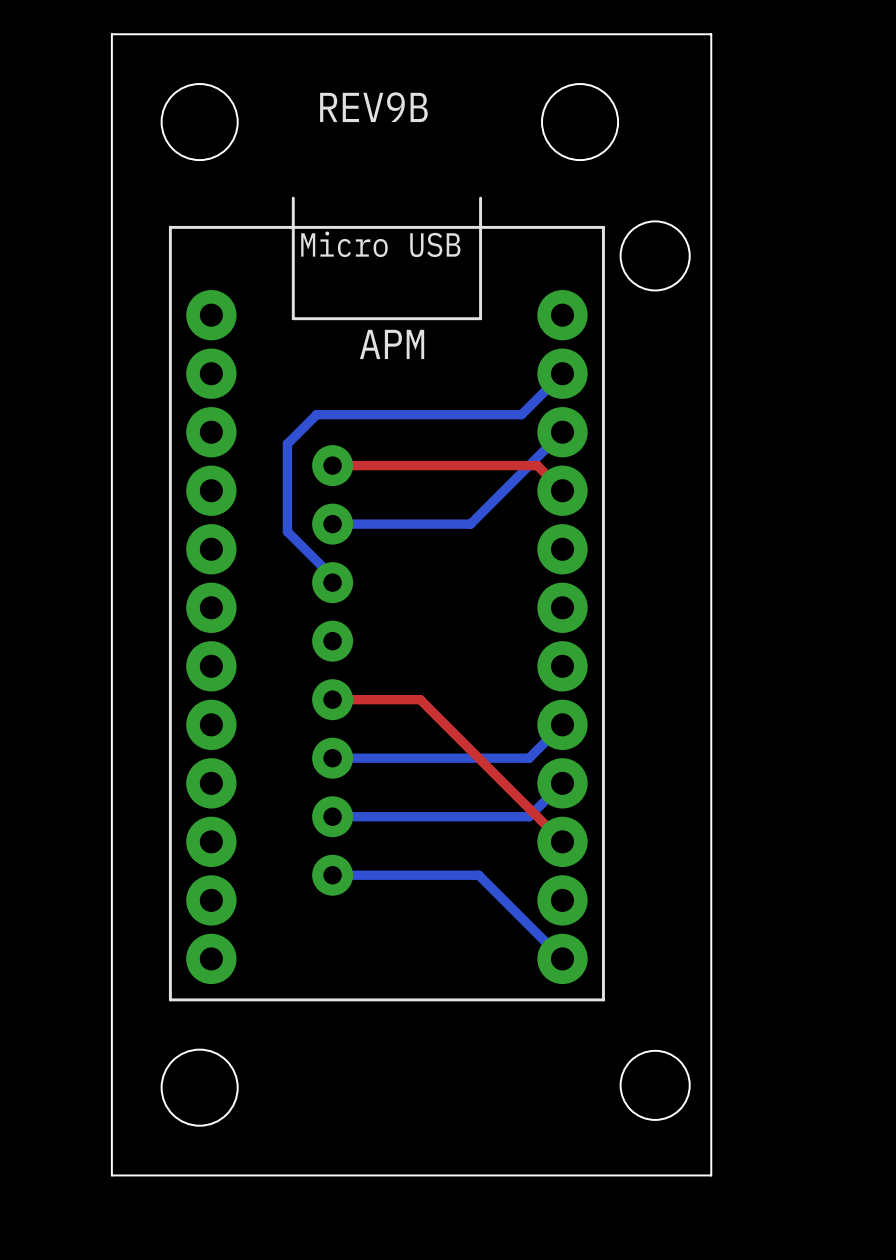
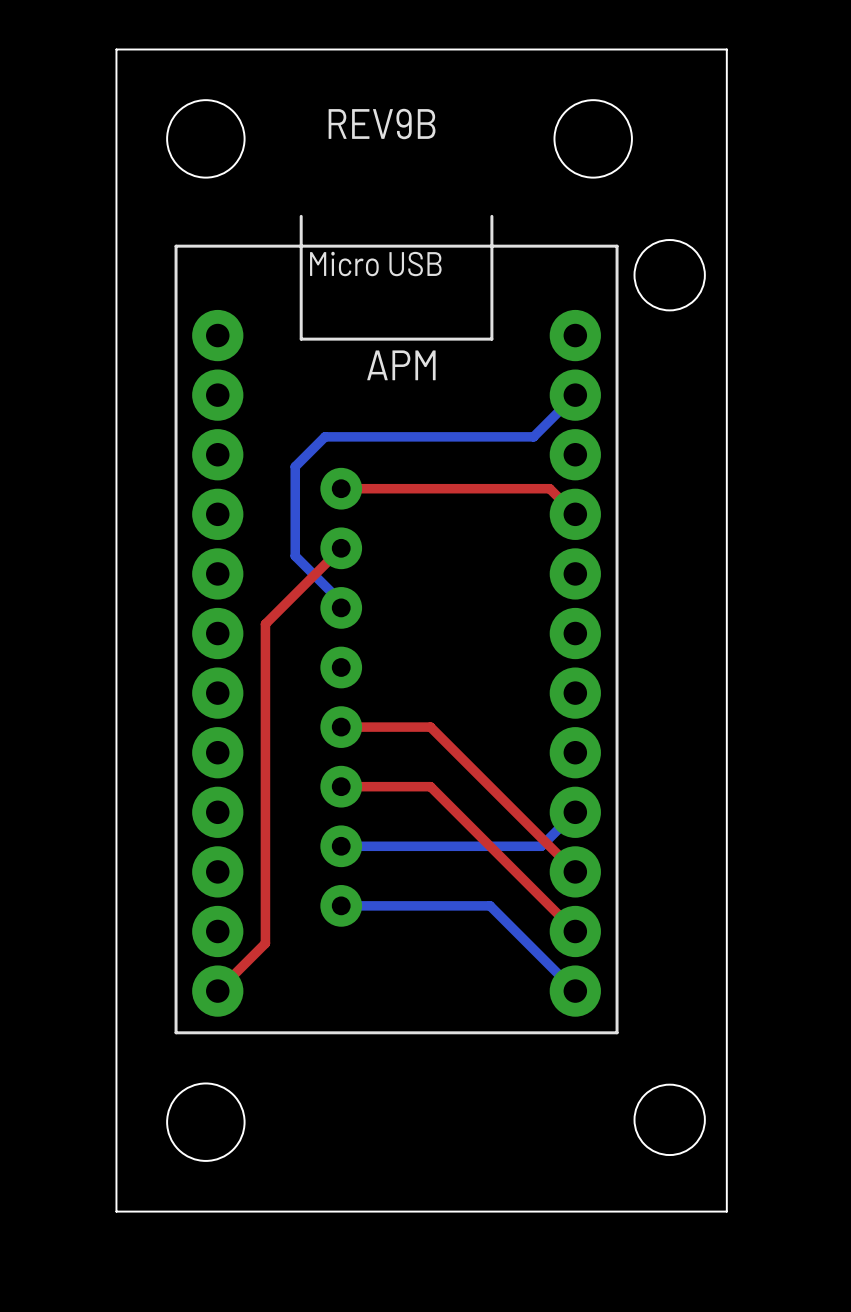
bottom track: (562, 432) (470, 524) (332, 524) -> none
top track: none -> (341, 548) (265, 624) (265, 943) (217, 991)
bottom track: (562, 724) (529, 758) (332, 758) -> none
top track: none -> (341, 786) (430, 786) (575, 931)

